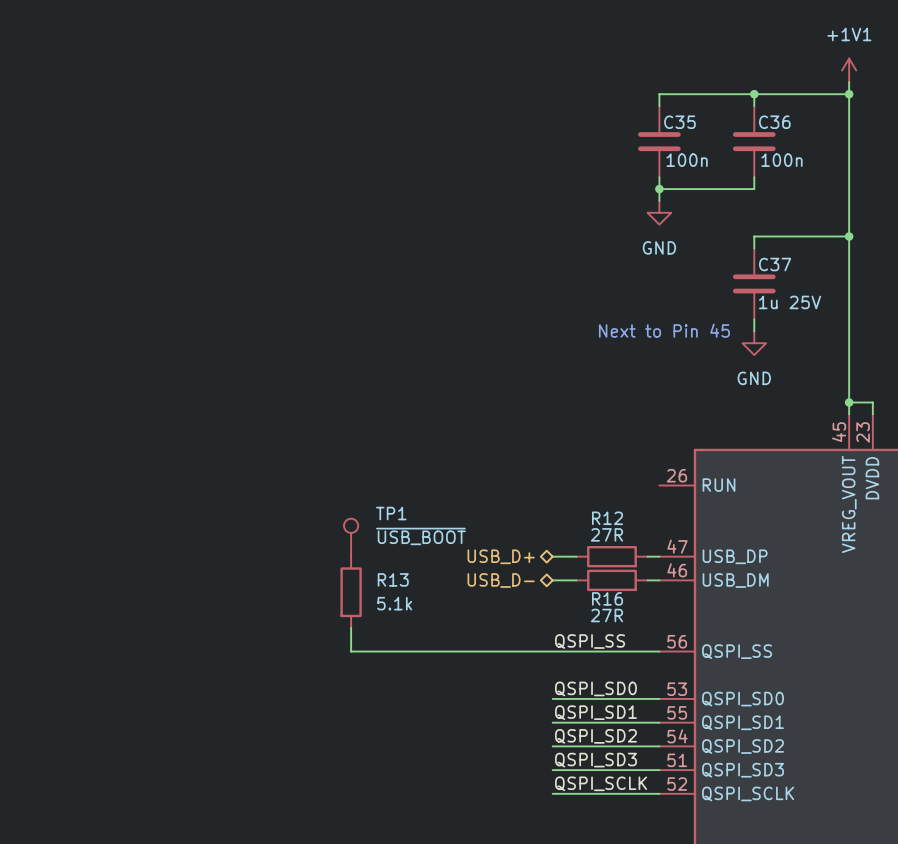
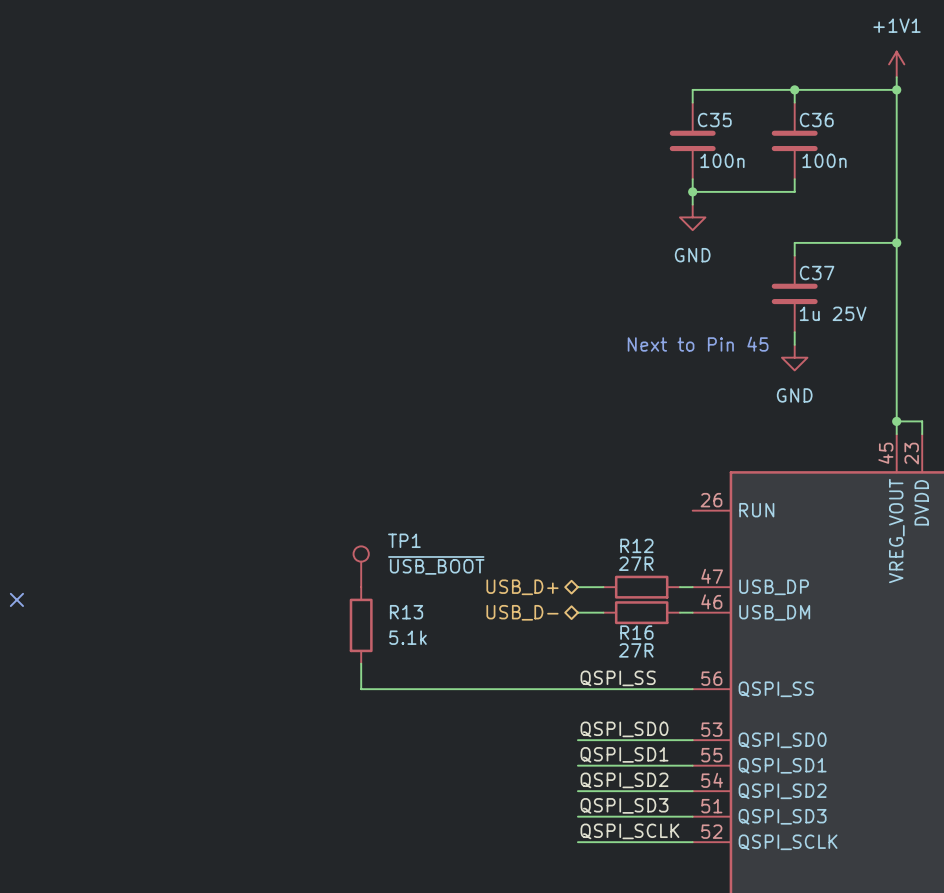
no-connect mark: none -> (16, 599)

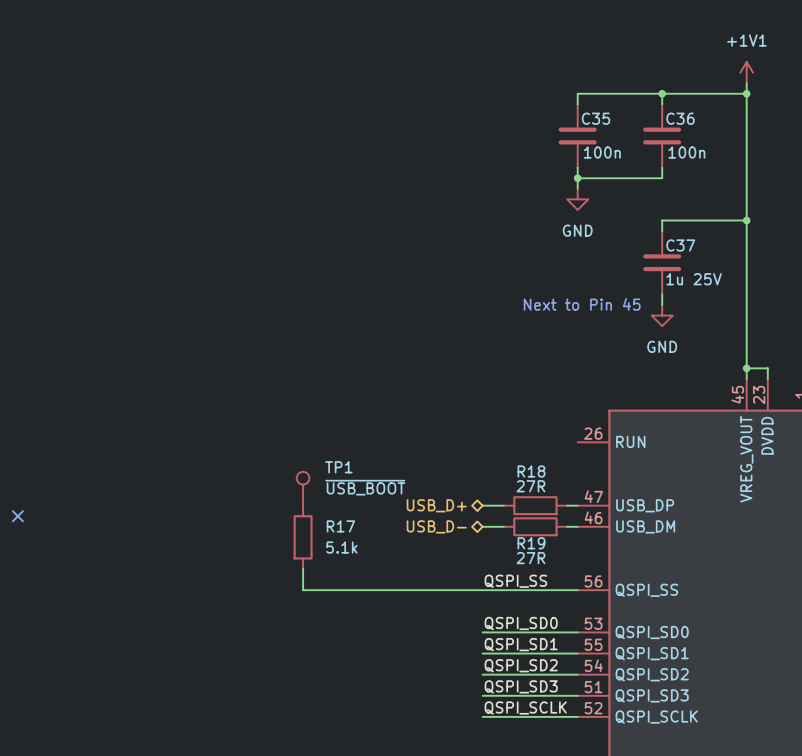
R12 name: R12 (636, 545) -> R18 (531, 471)
R13 name: R13 (406, 612) -> R17 (340, 526)
R16 name: R16 (636, 632) -> R19 (531, 543)

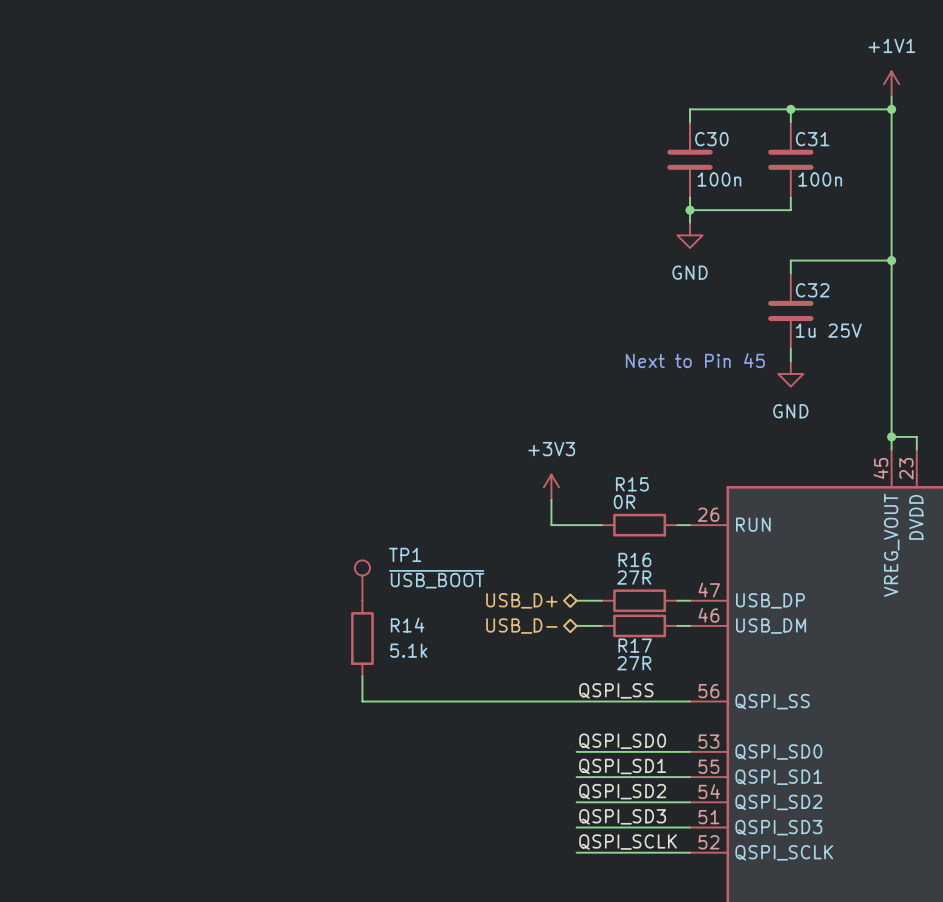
C35 name: C35 (595, 118) -> C30 (711, 139)
C36 name: C36 (680, 118) -> C31 (812, 139)
C37 name: C37 (680, 245) -> C32 (812, 290)
power symbol: none -> +3V3 (551, 487)
wire: none -> (551, 499) (551, 525) (601, 525)
R15: none -> 0R (639, 525)
wire: none -> (677, 525) (690, 525)
R18 name: R18 (531, 471) -> R16 (634, 559)
no-connect mark: (17, 516) -> none
R17 name: R17 (340, 526) -> R14 (407, 625)
R19 name: R19 (531, 543) -> R17 (635, 645)

